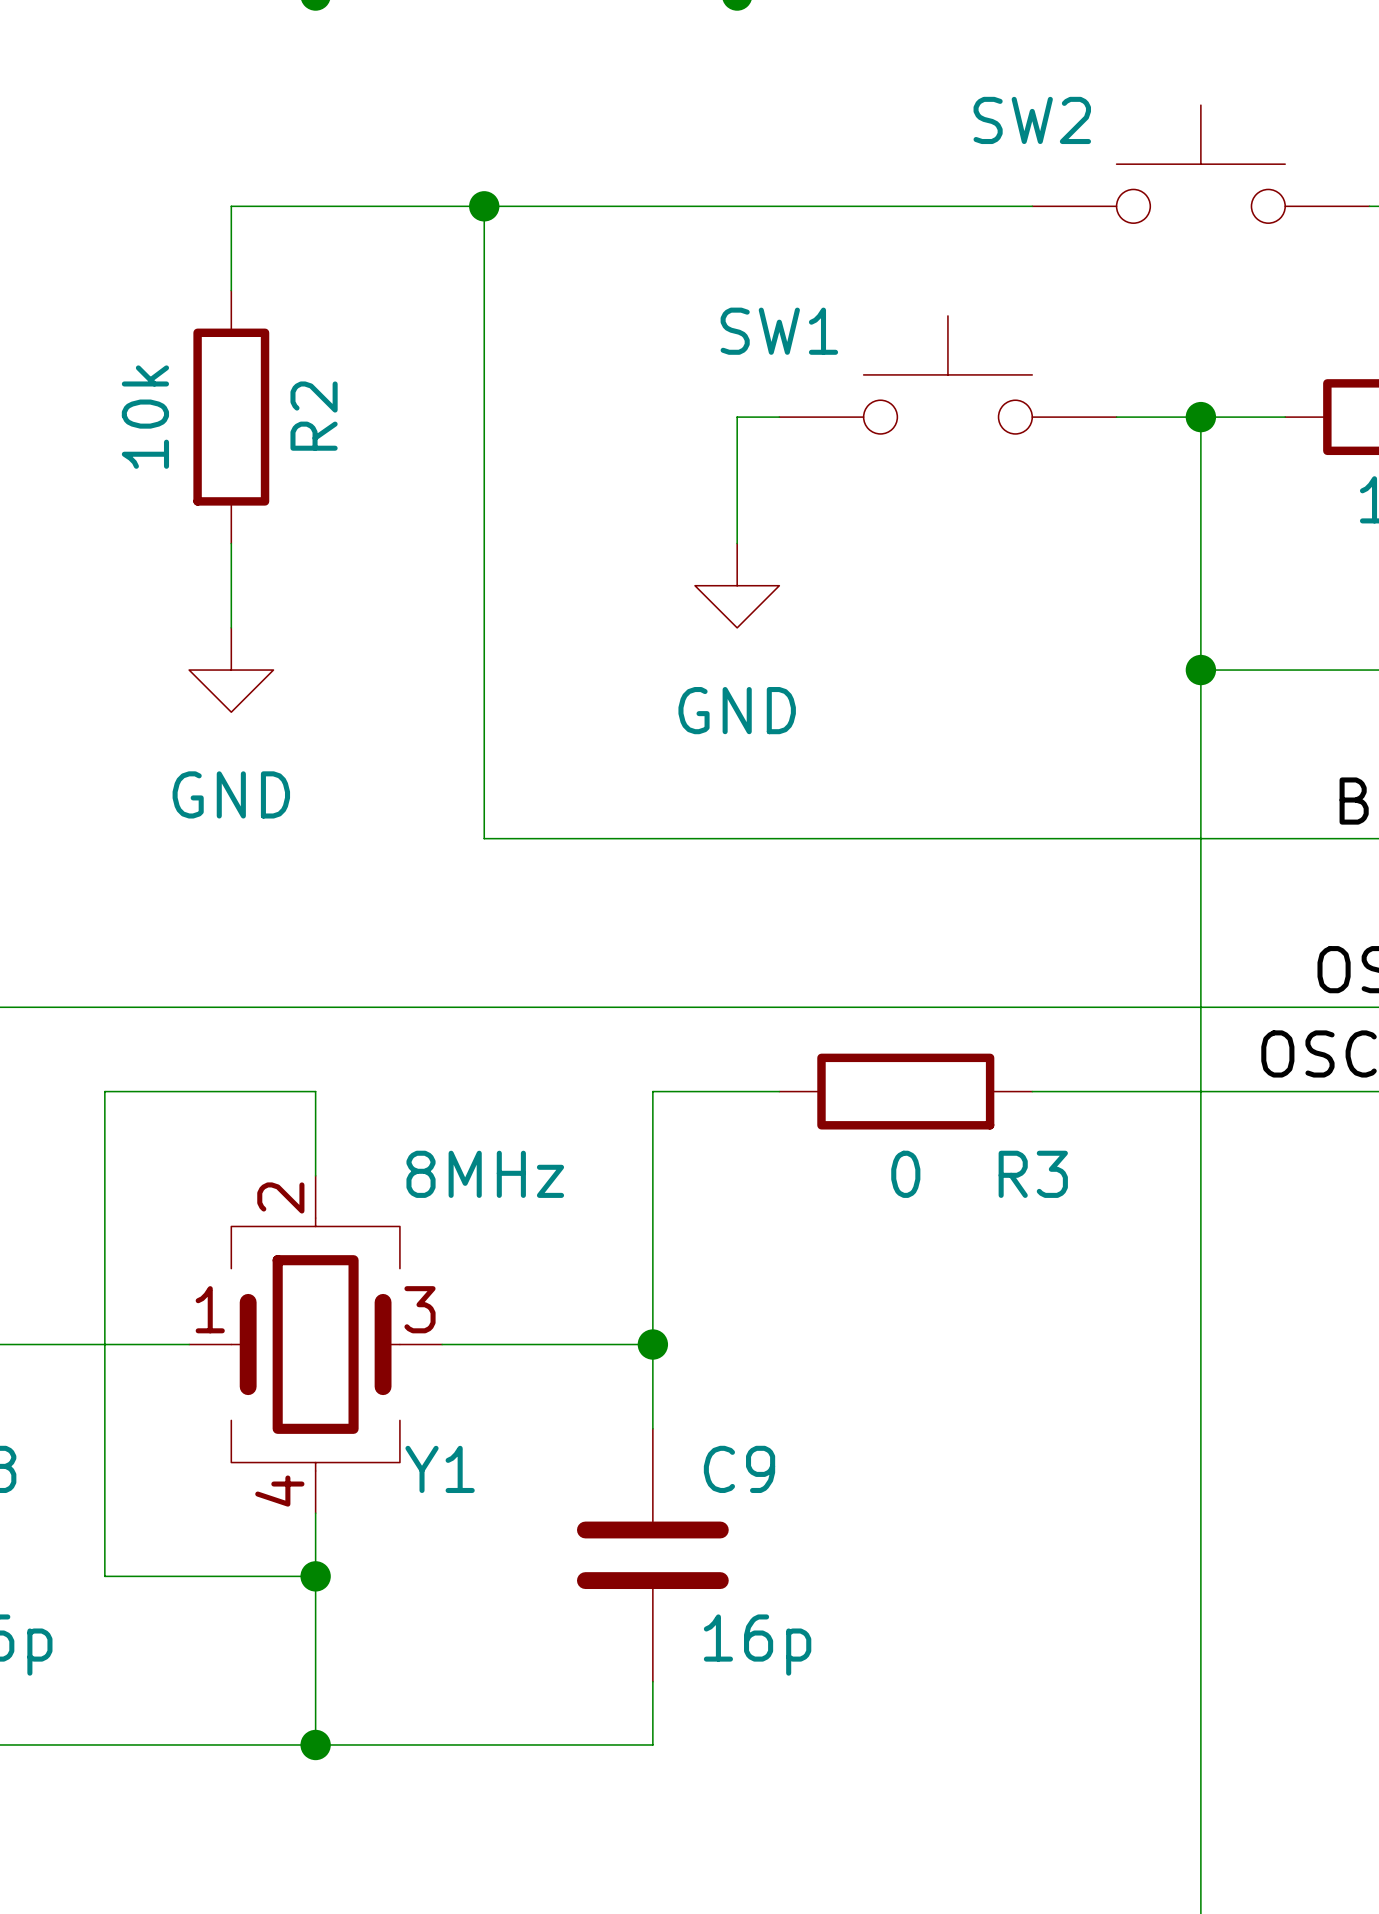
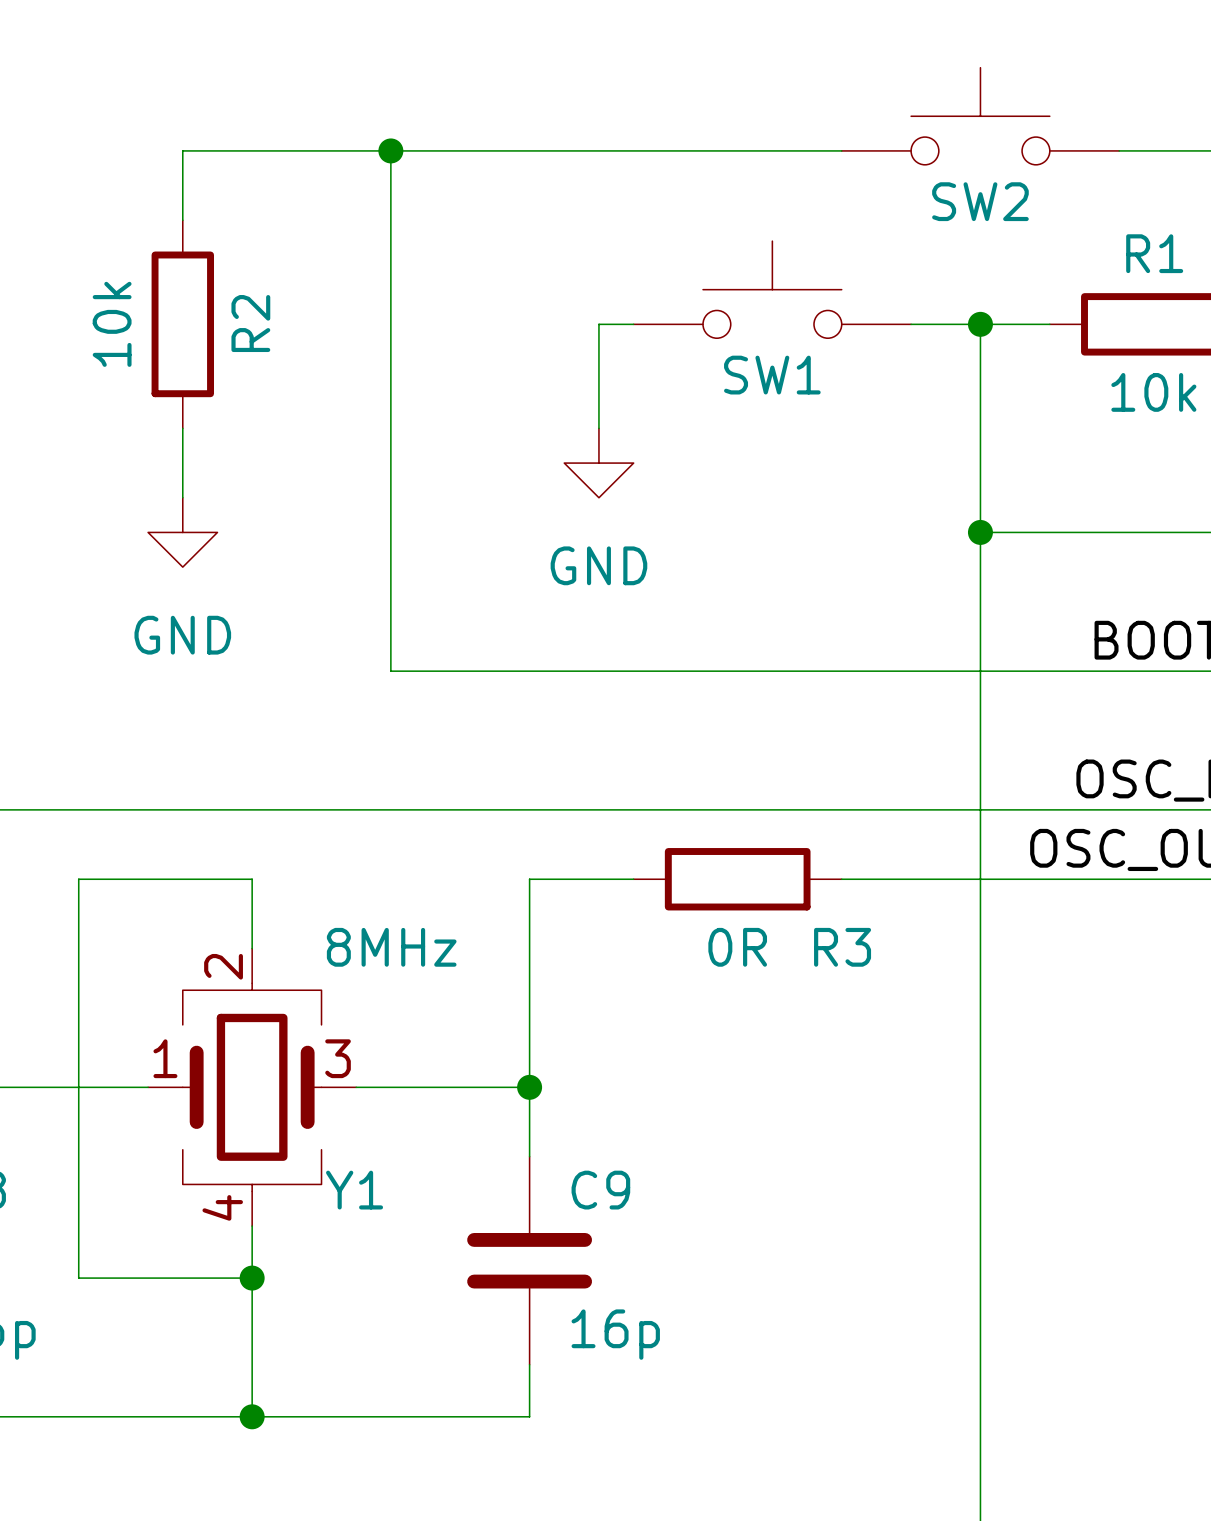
SW2 name position: SW2 (1032, 120) -> SW2 (980, 201)
SW1 name position: SW1 (779, 331) -> SW1 (772, 375)
R3 value: 0 (905, 1174) -> 0R (737, 947)

